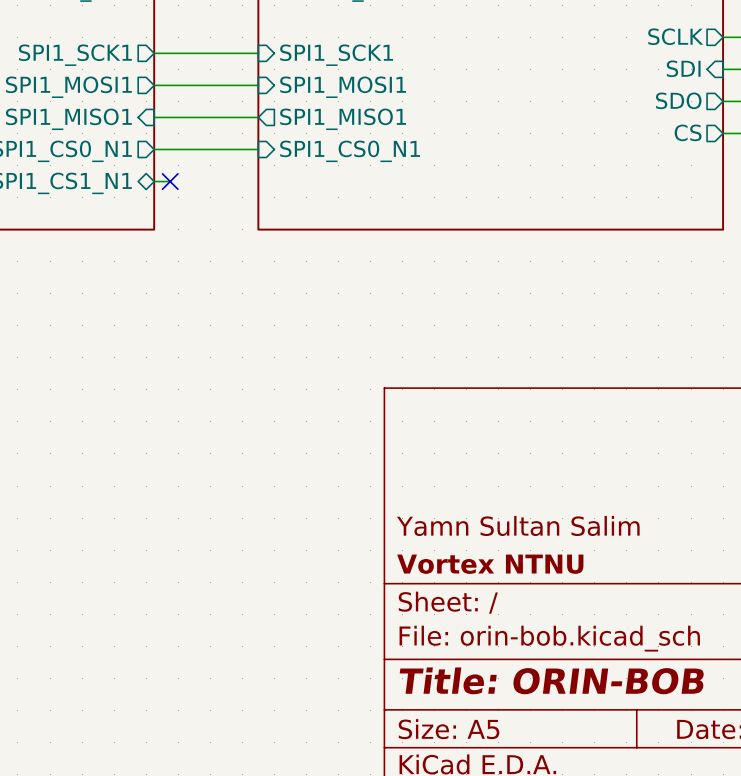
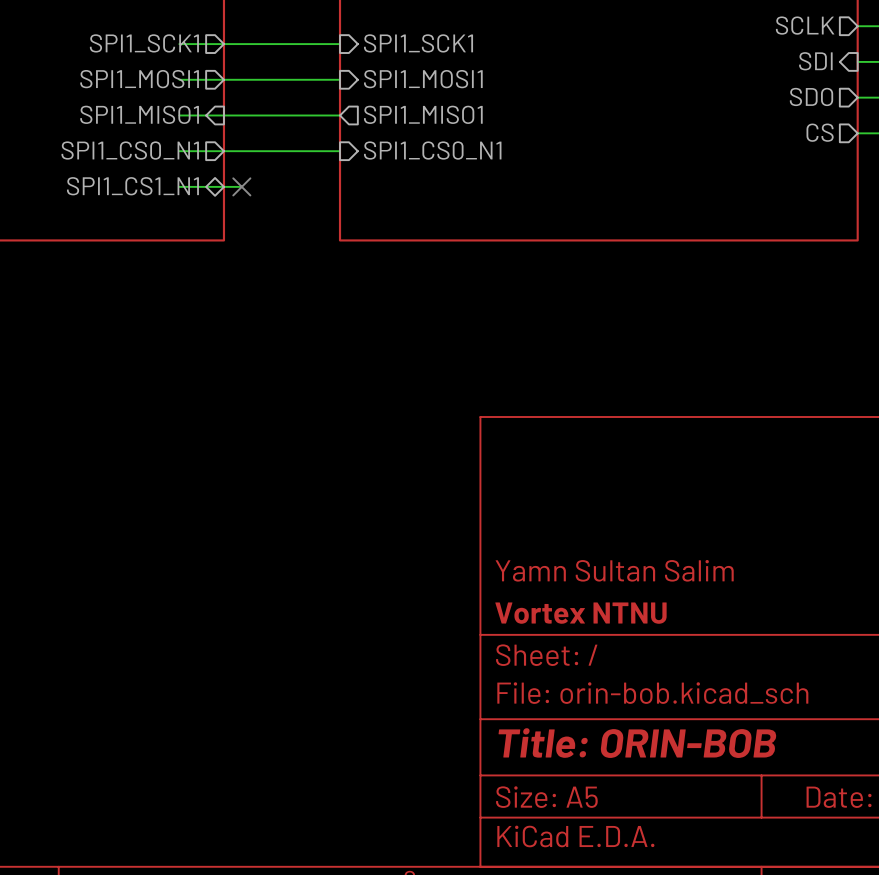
wire: none -> (179, 44) (223, 44)
wire: none -> (179, 79) (223, 79)
wire: none -> (179, 115) (223, 115)
wire: none -> (179, 151) (223, 151)
wire: none -> (179, 186) (223, 186)

